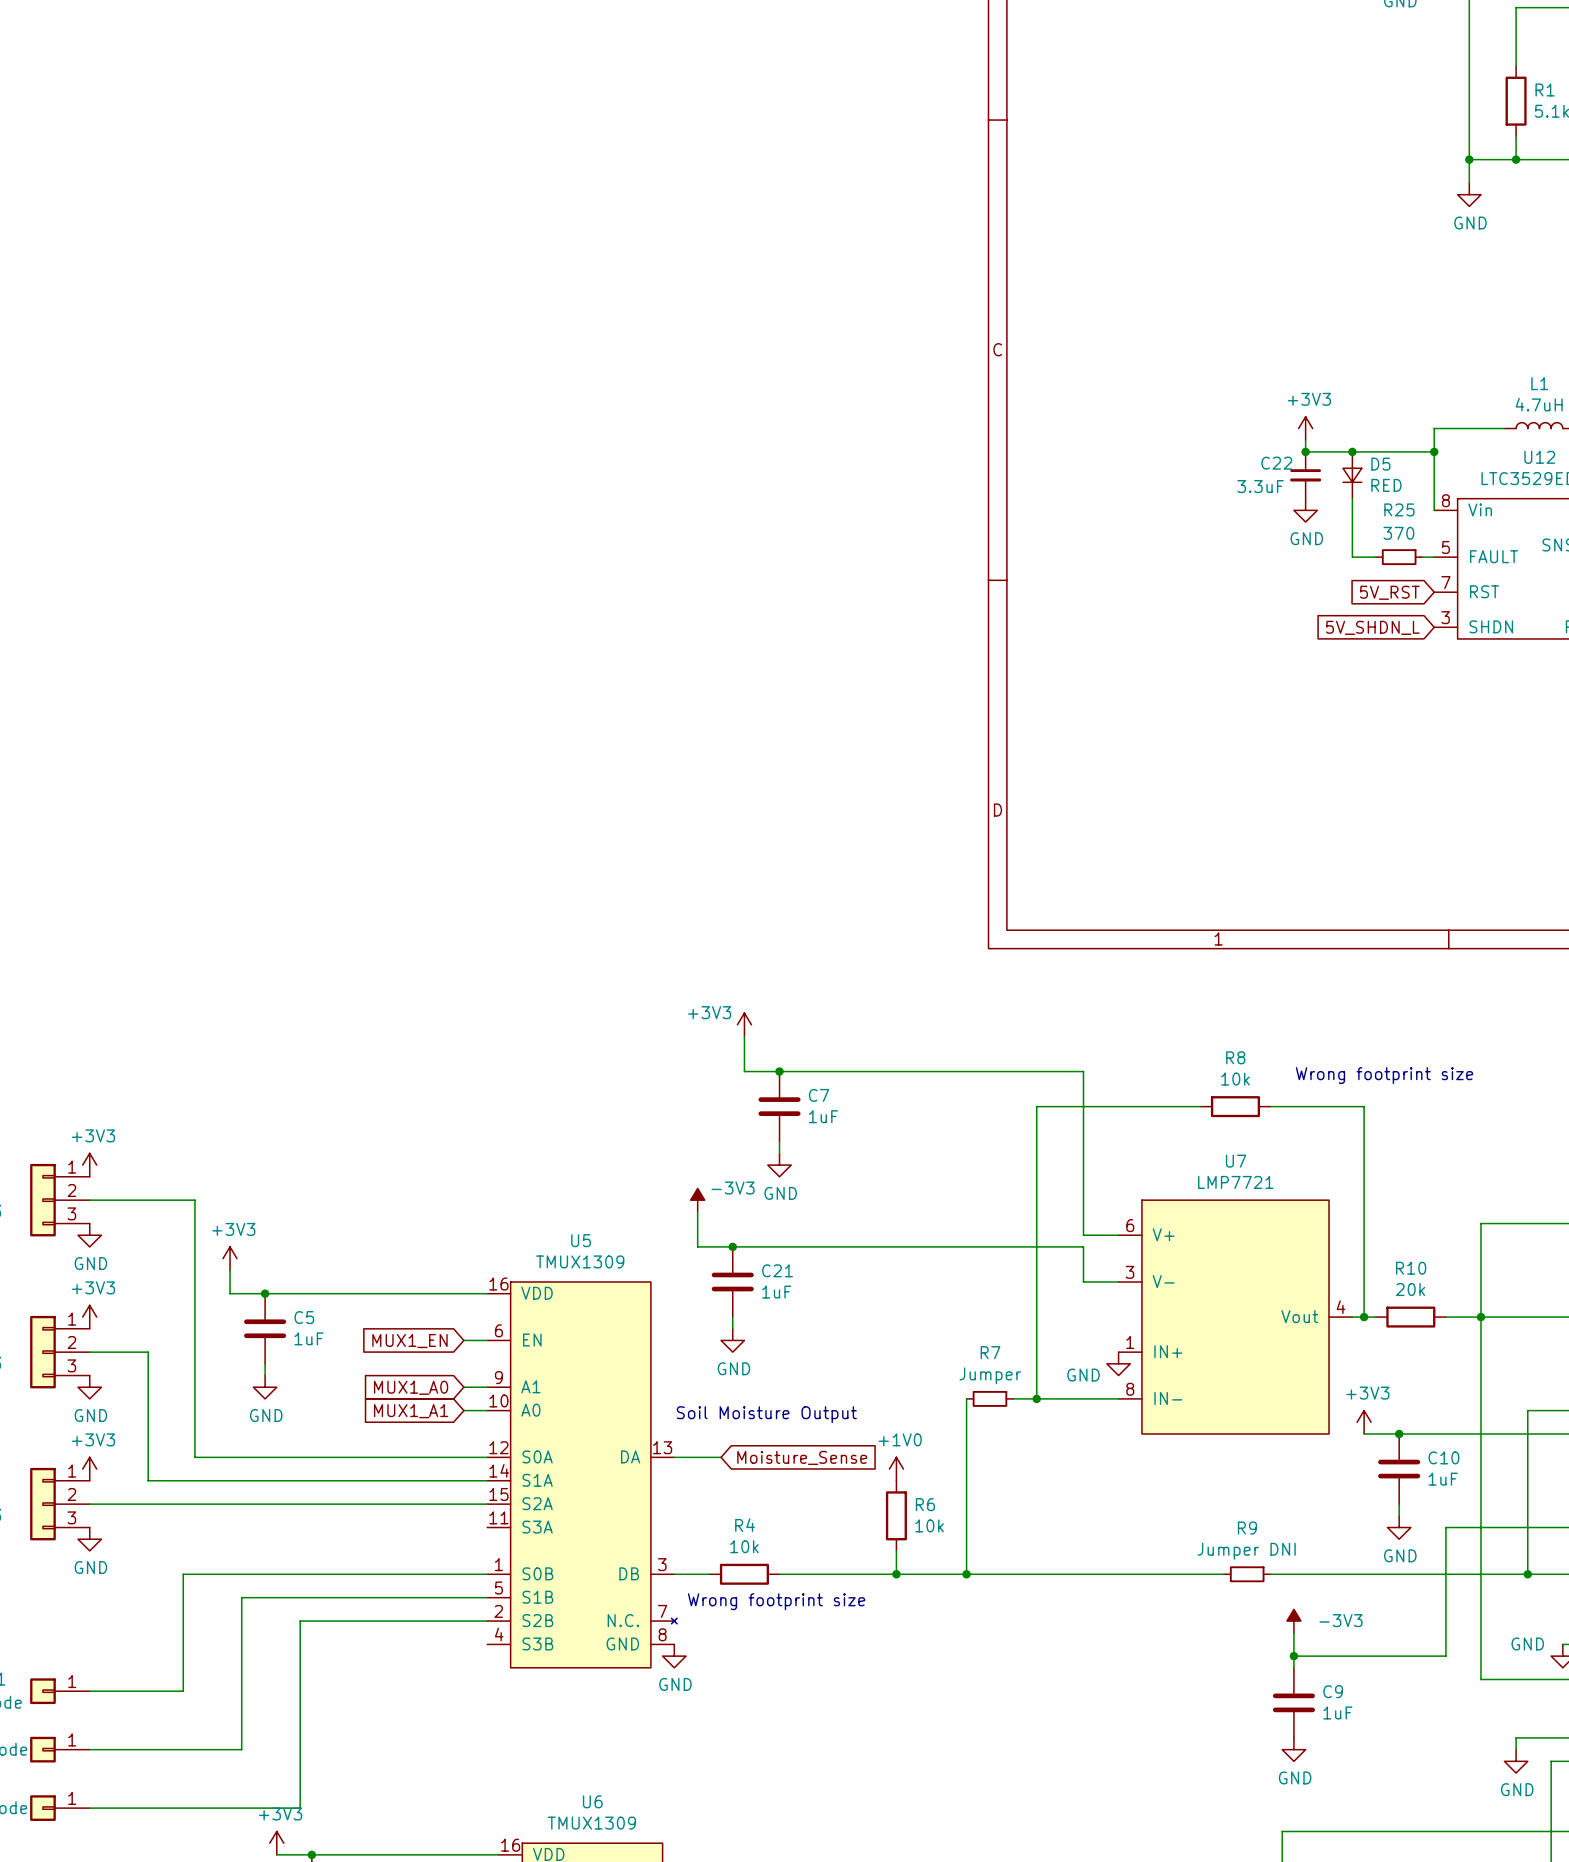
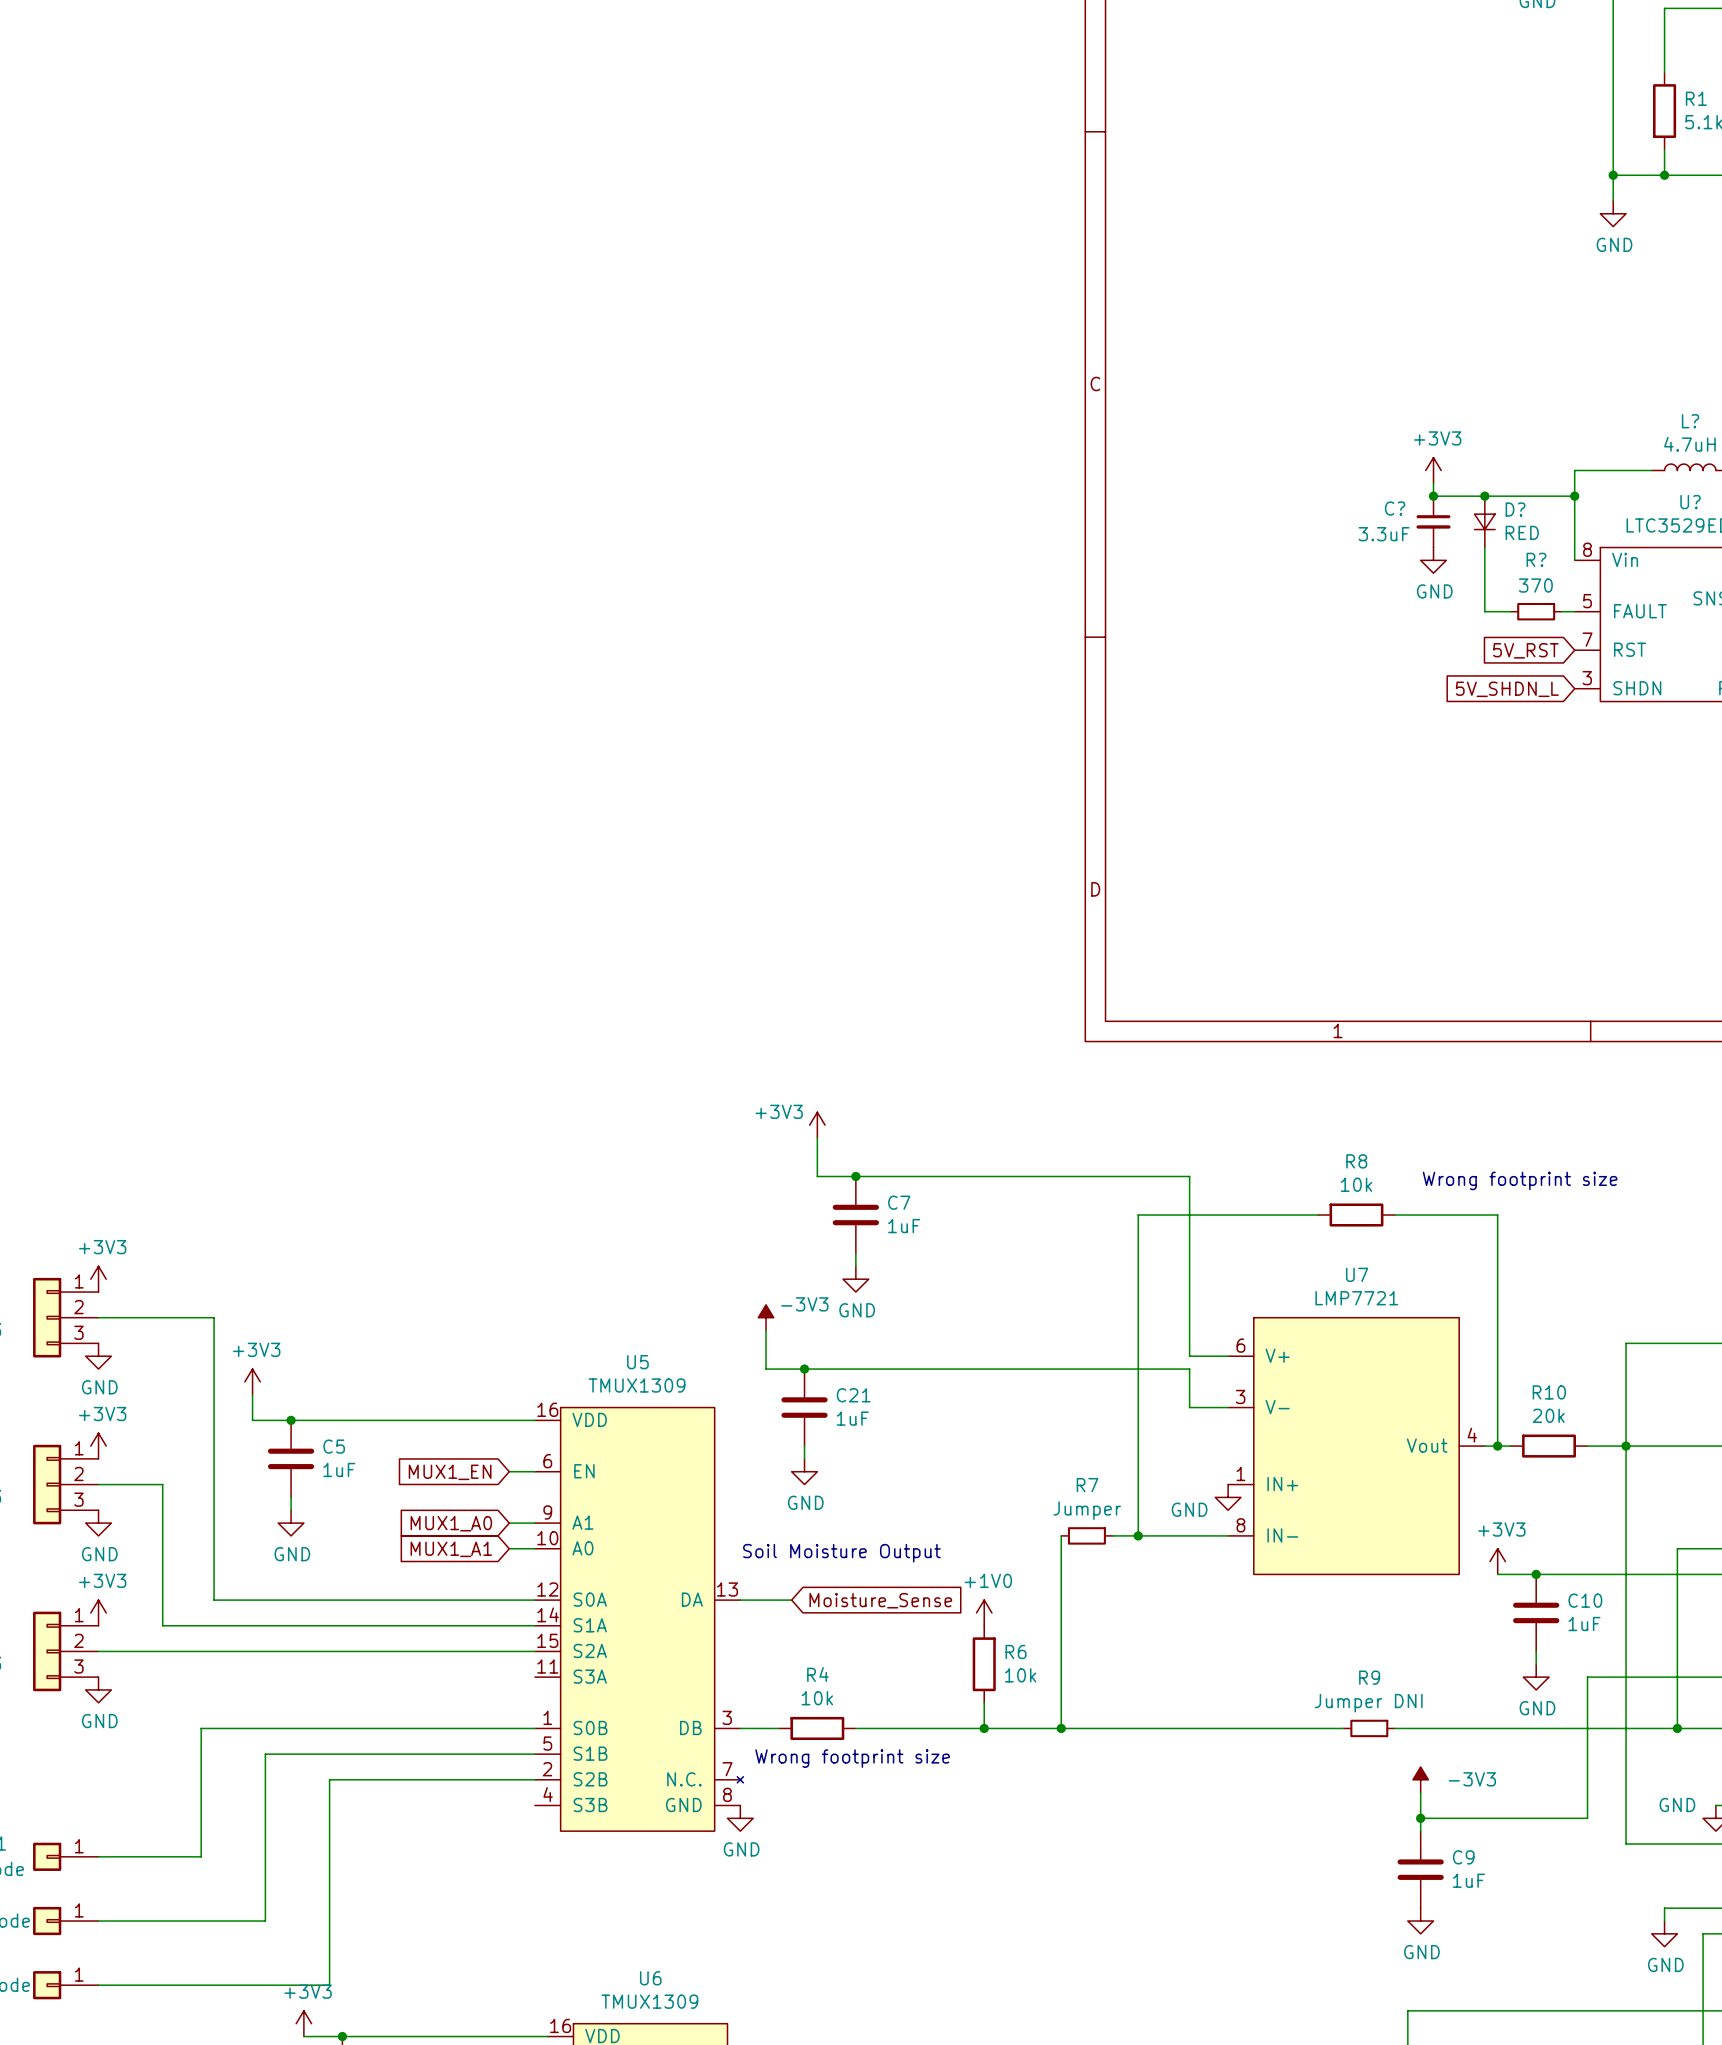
L1 name: L1 (1539, 383) -> L? (1690, 421)
U12 name: U12 (1539, 457) -> U? (1690, 502)
C22 name: C22 (1276, 463) -> C? (1395, 508)
D5 name: D5 (1380, 464) -> D? (1515, 509)
R25 name: R25 (1399, 509) -> R? (1536, 559)

